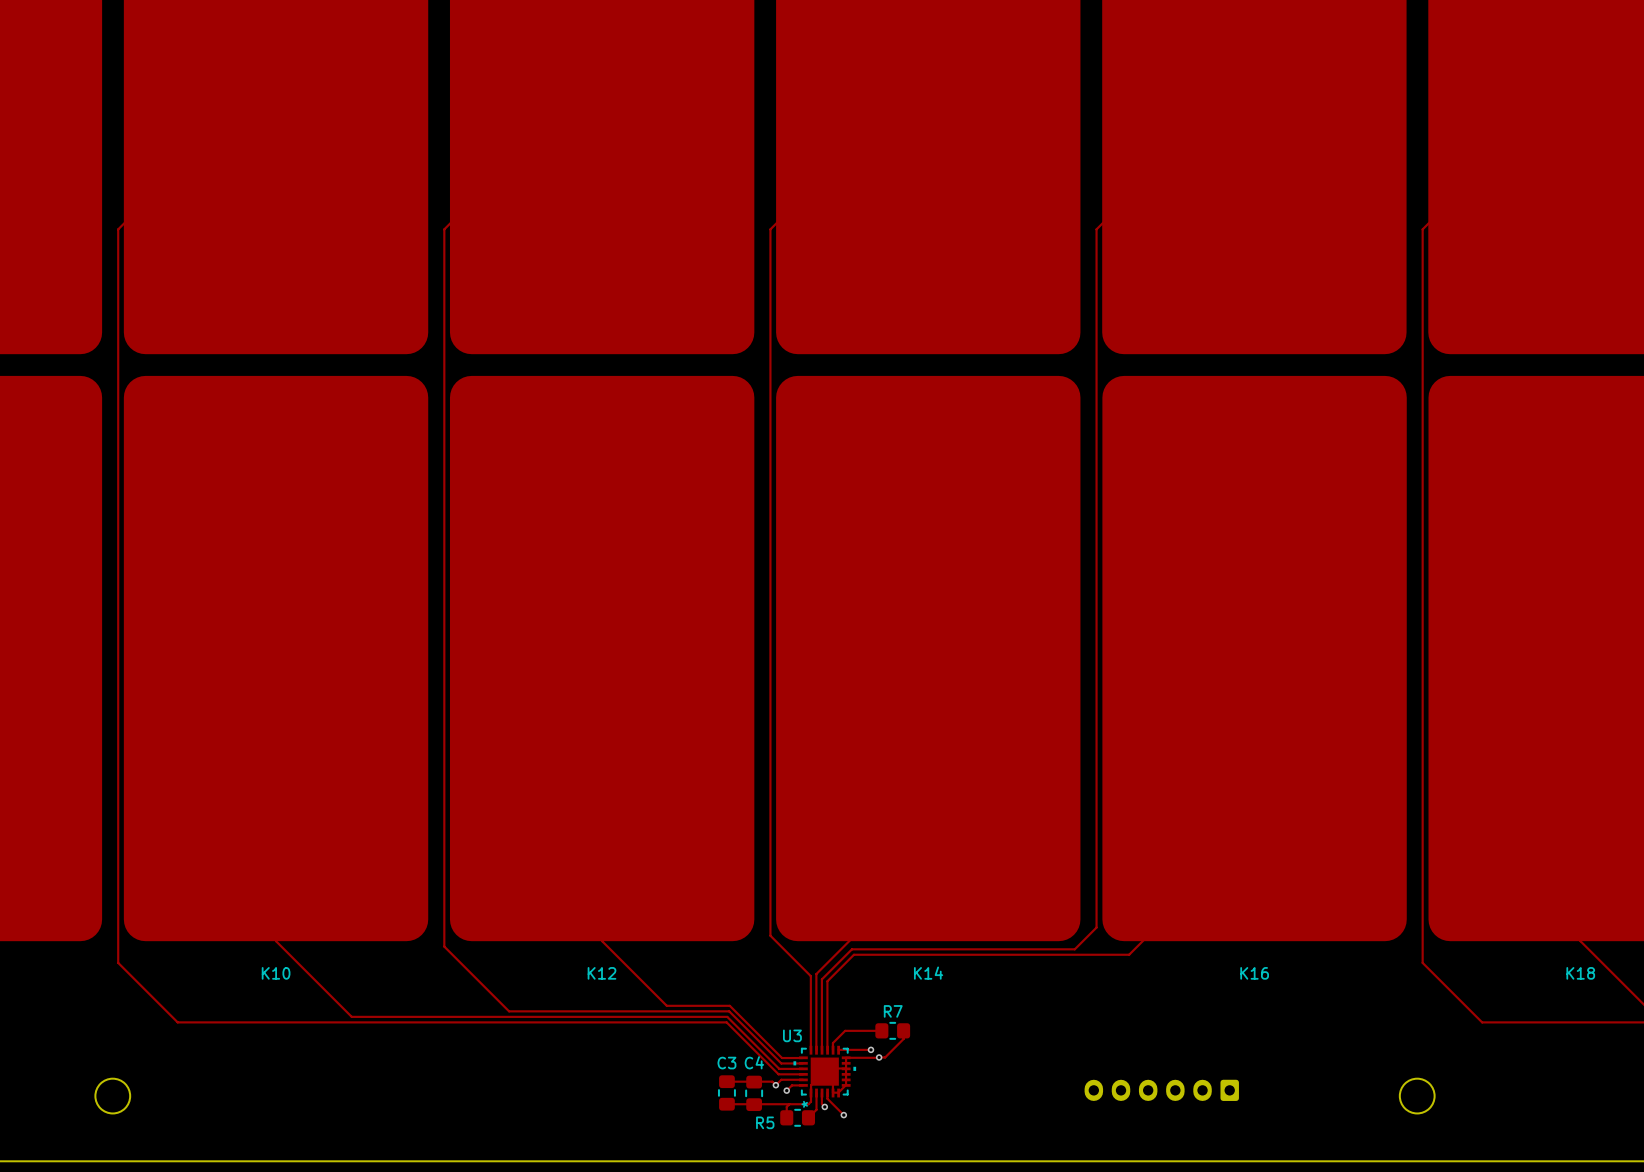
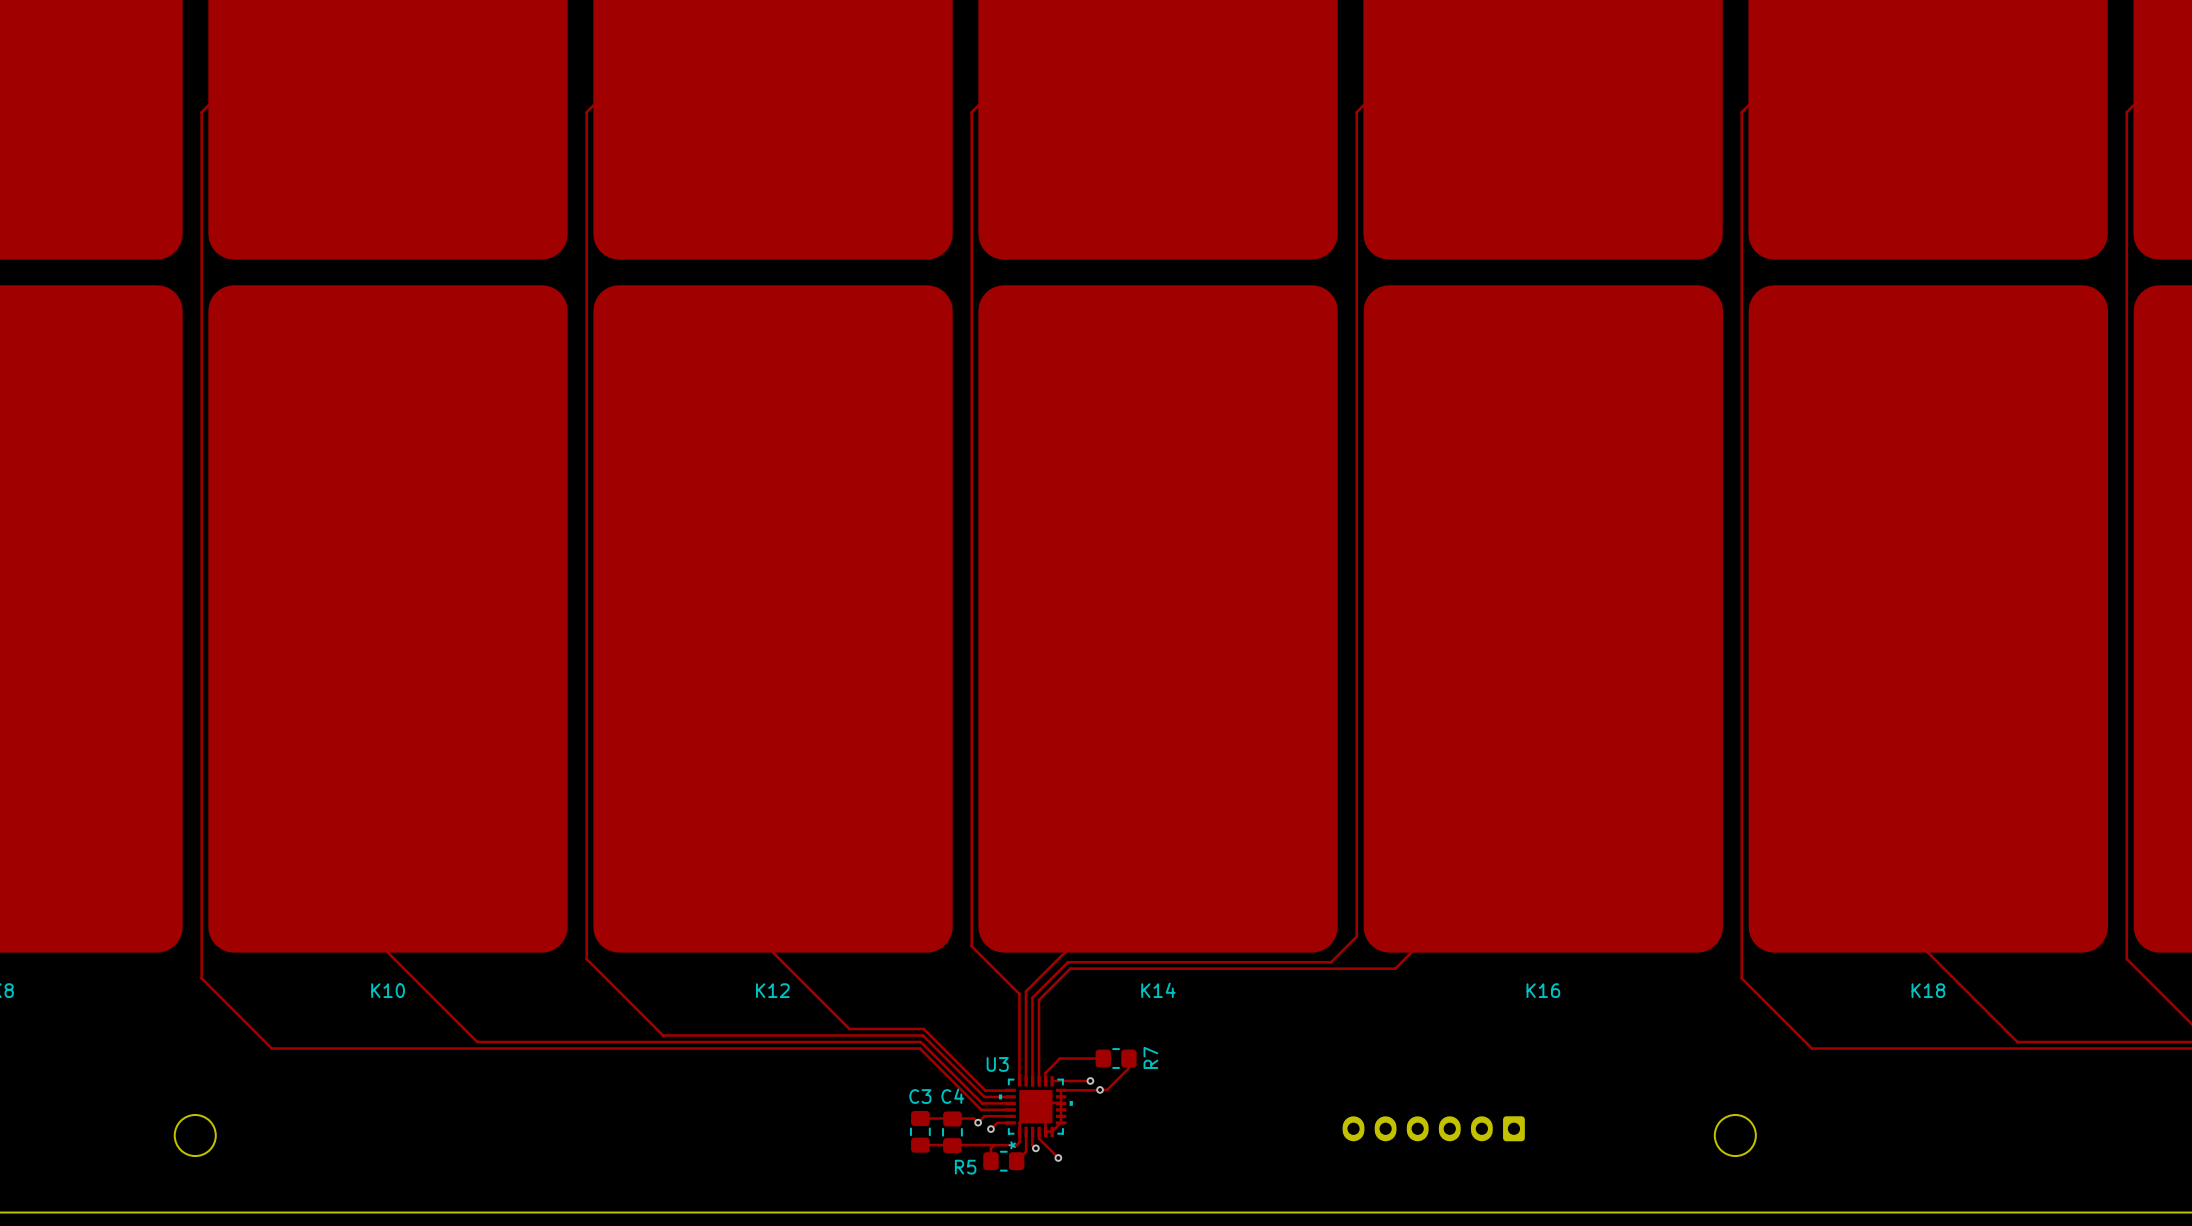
R7 name rotation: 0° (893, 1011) -> 90° counterclockwise (1150, 1057)
R7 name position: R7 (893, 1011) -> R7 (1150, 1057)

